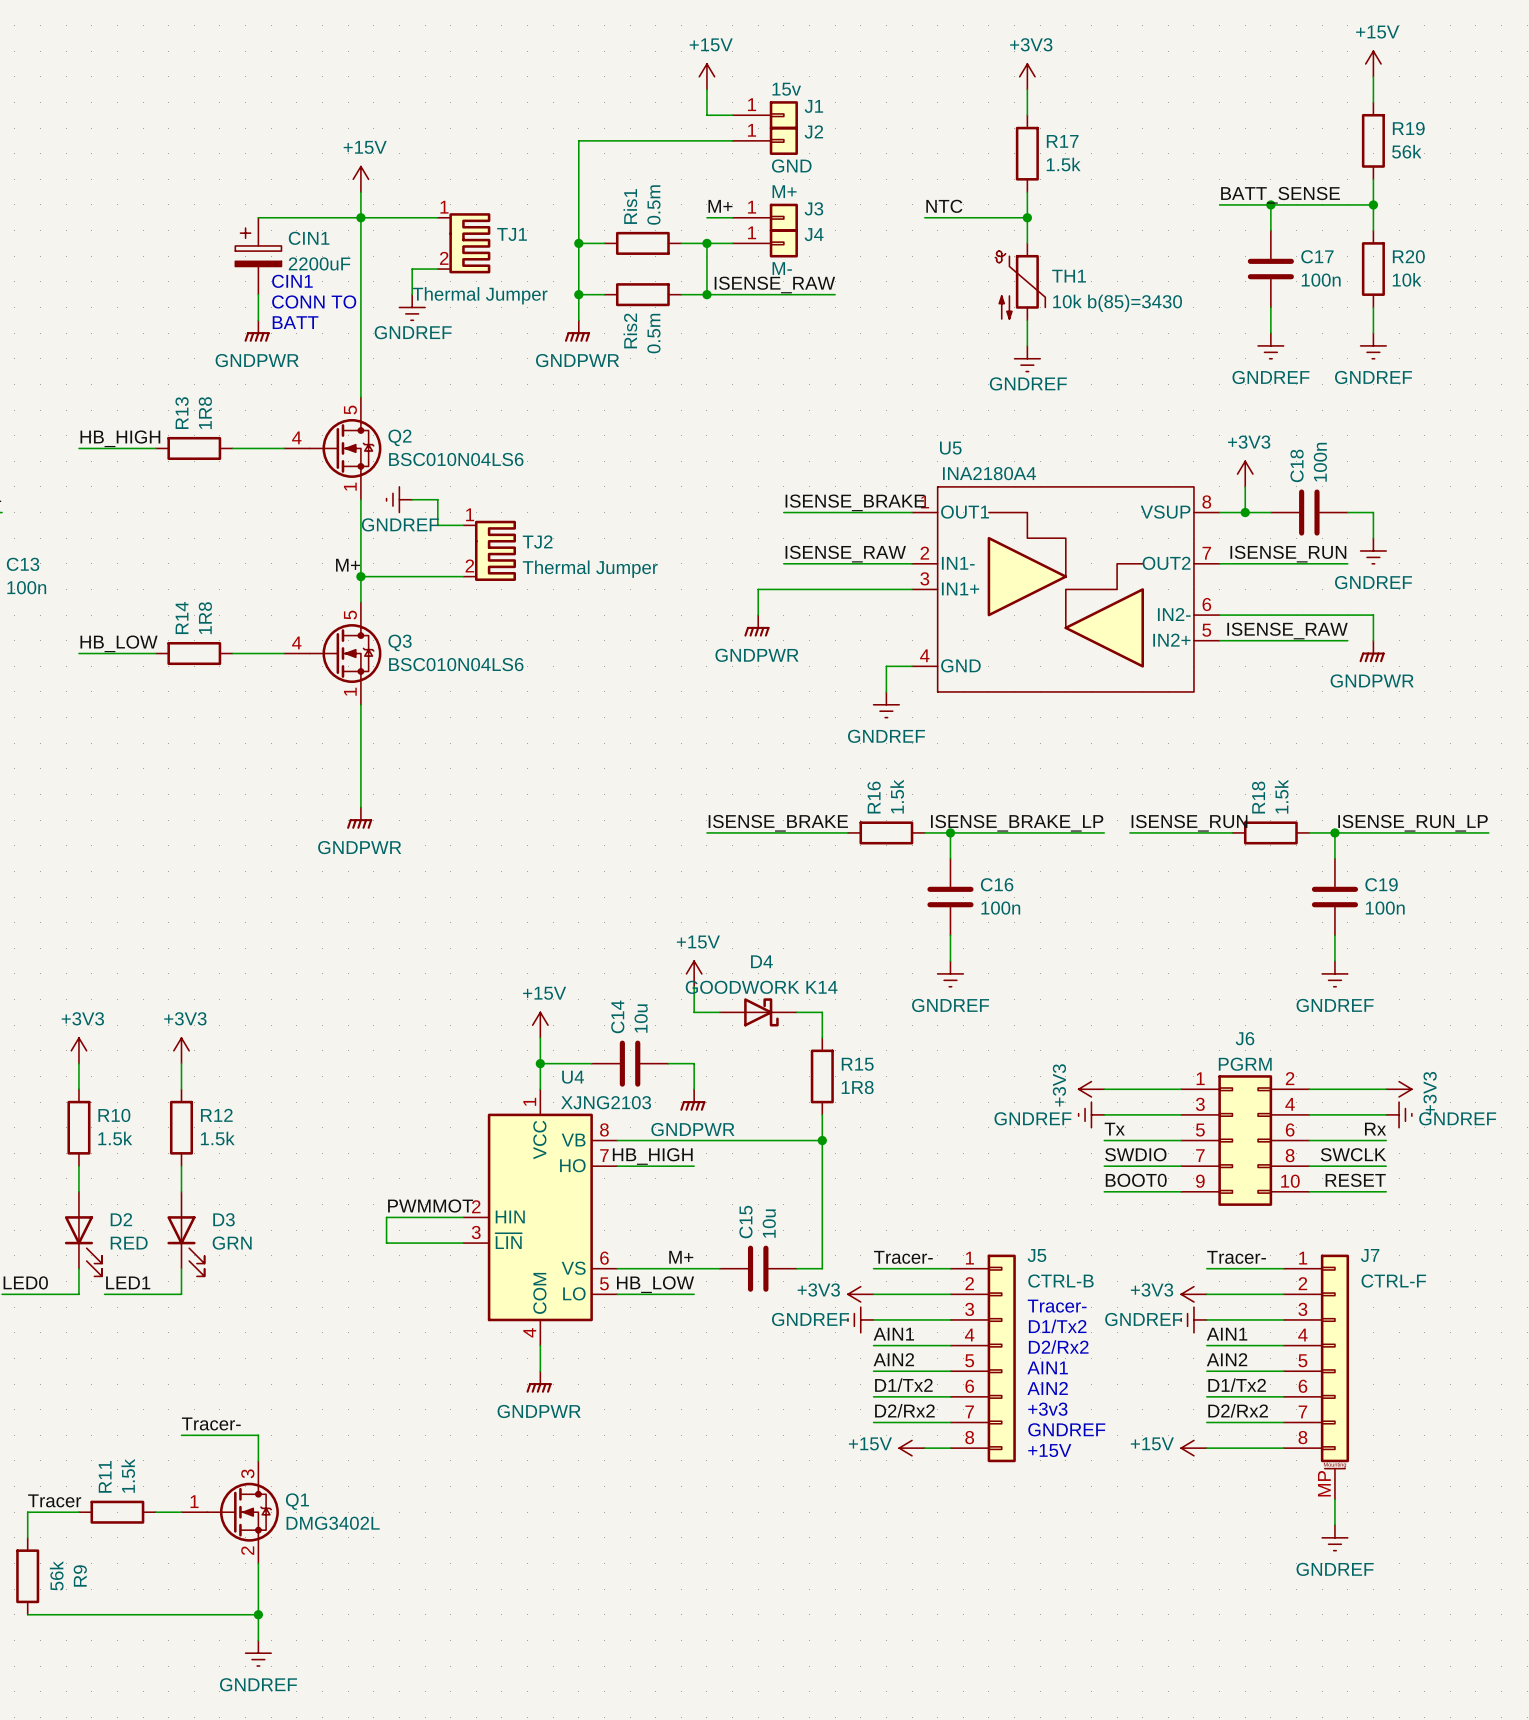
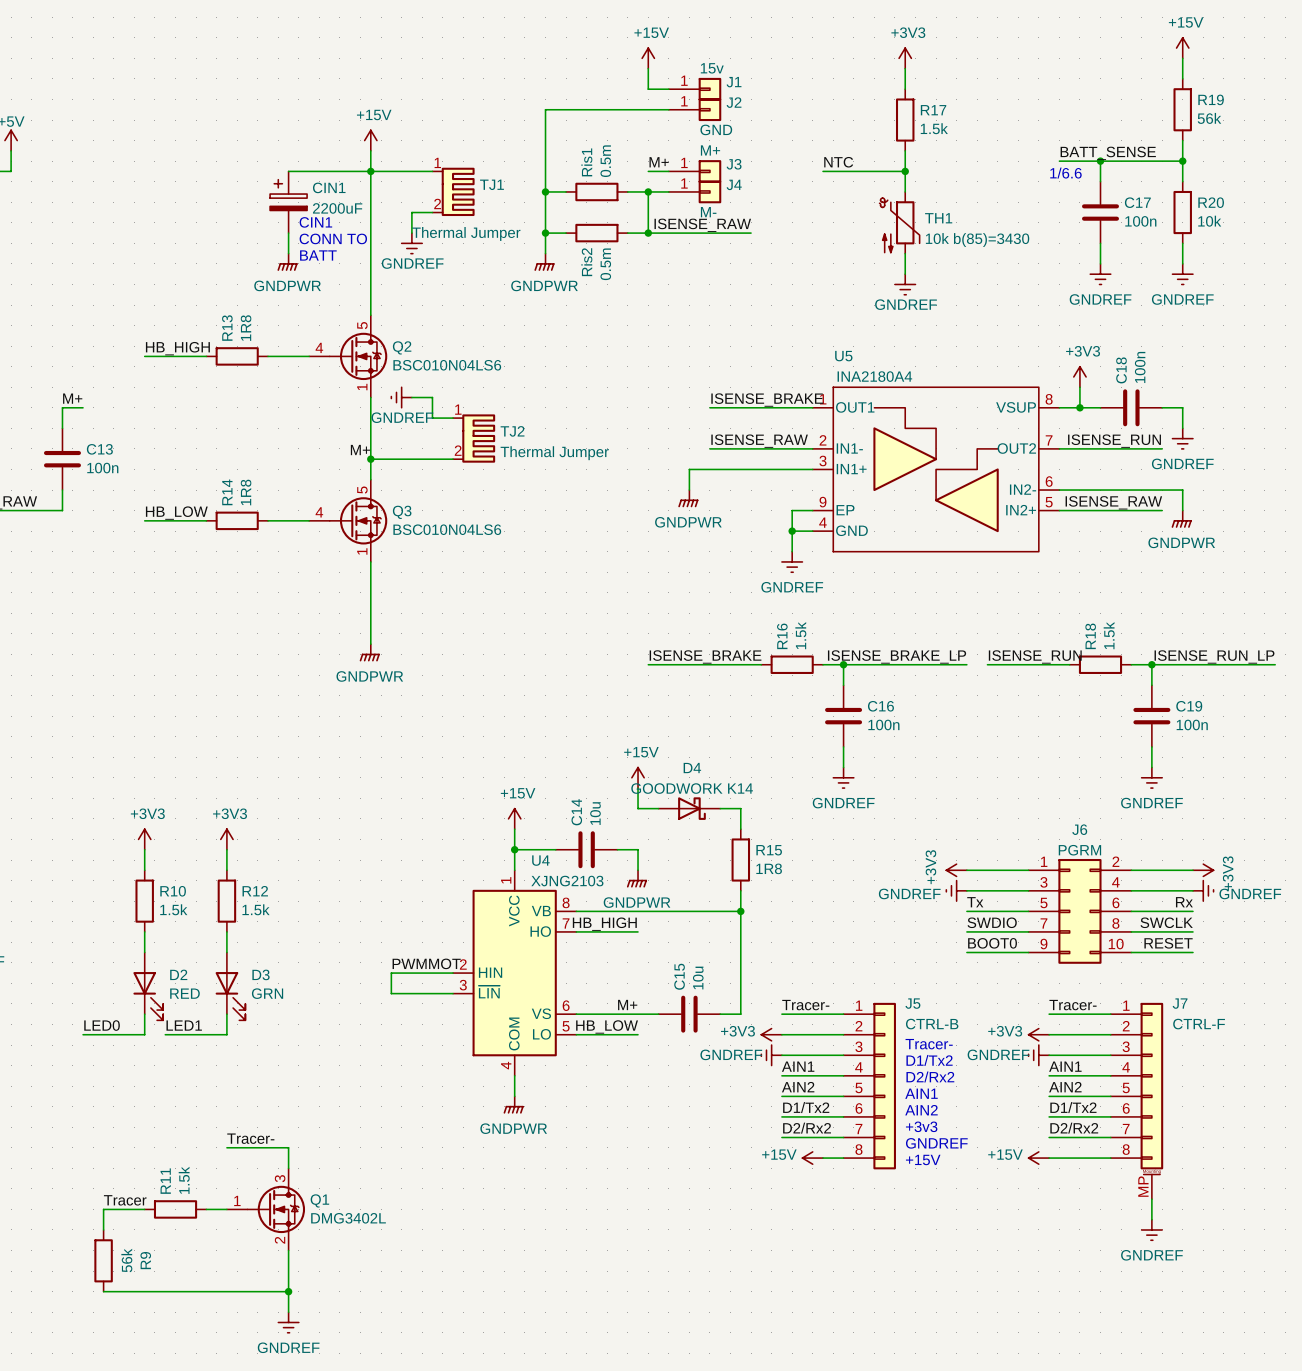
text: none -> 1/6.6 (1065, 173)
U5 symbol: [912, 486, 1220, 693] -> [812, 386, 1060, 553]
wire: none -> (812, 510) (792, 510) (792, 531)
junction: none -> (792, 531)

